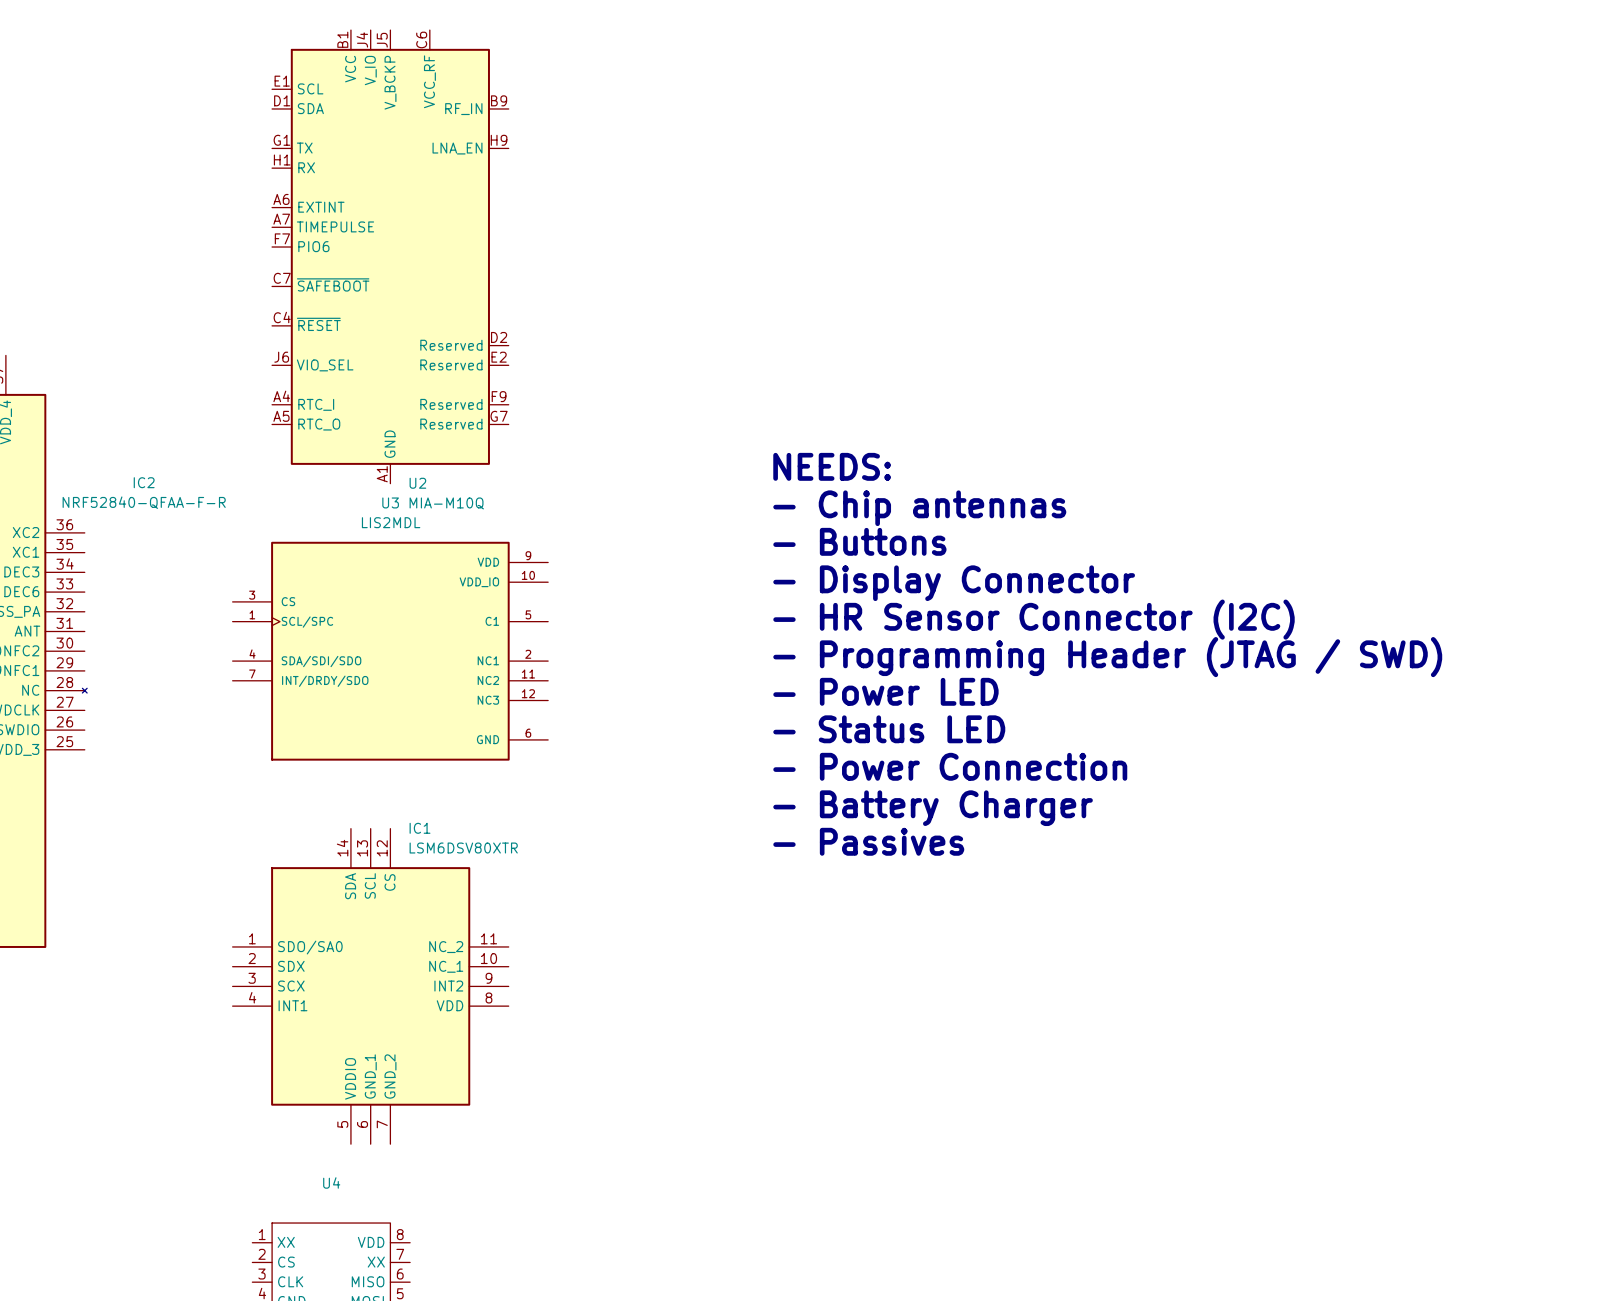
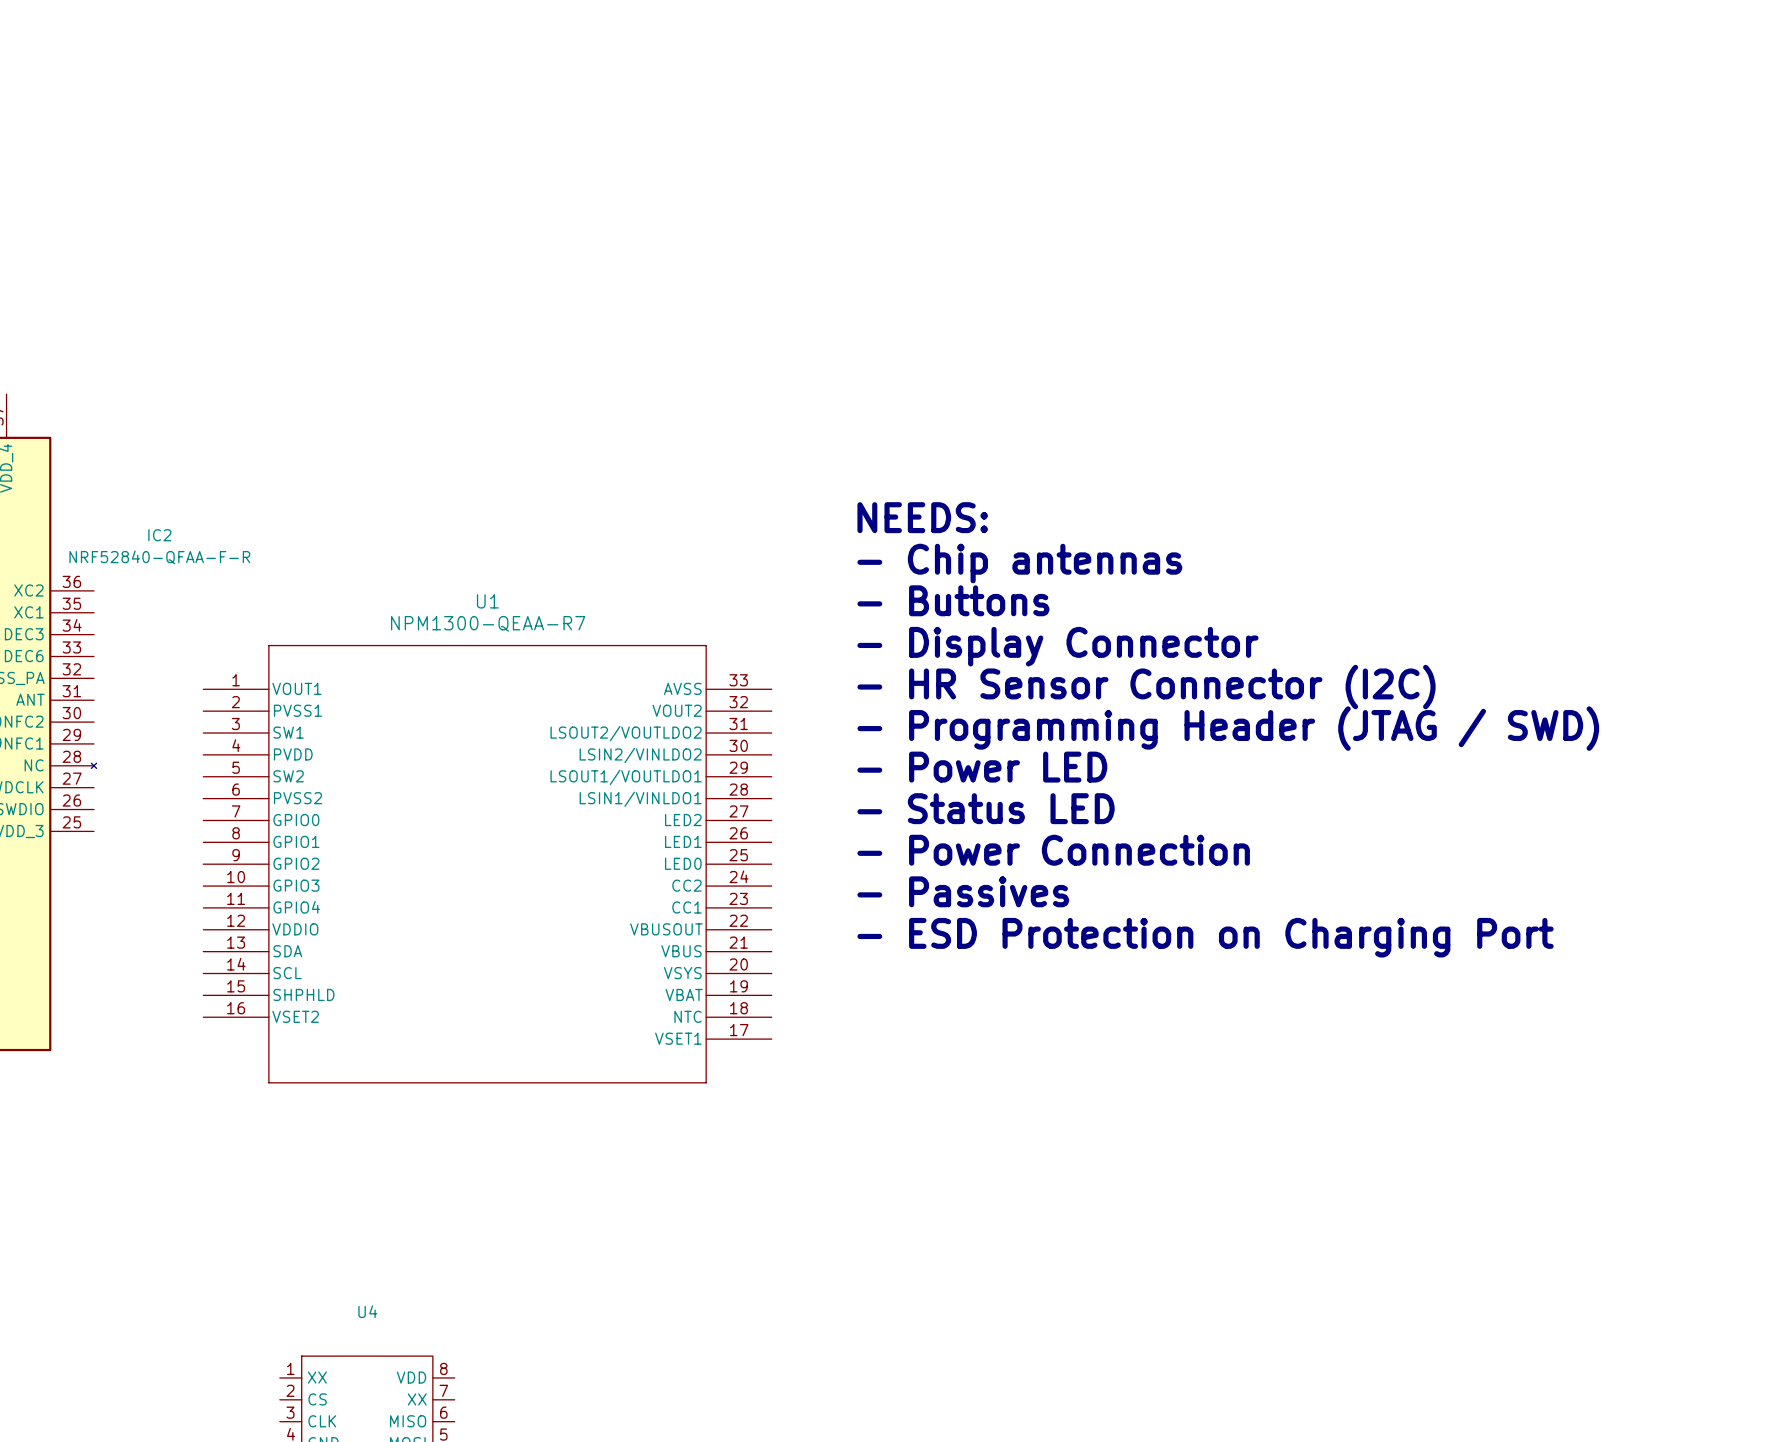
U2: MIA-M10Q (390, 256) -> none
U3: LIS2MDL (390, 651) -> none
U1: none -> NPM1300-QEAA-R7 (487, 864)
text: - Battery Charger (933, 808) -> - Passives (963, 891)
text: - Passives (868, 841) -> - ESD Protection on Charging Port (1205, 937)
IC1: LSM6DSV80XTR (370, 986) -> none

